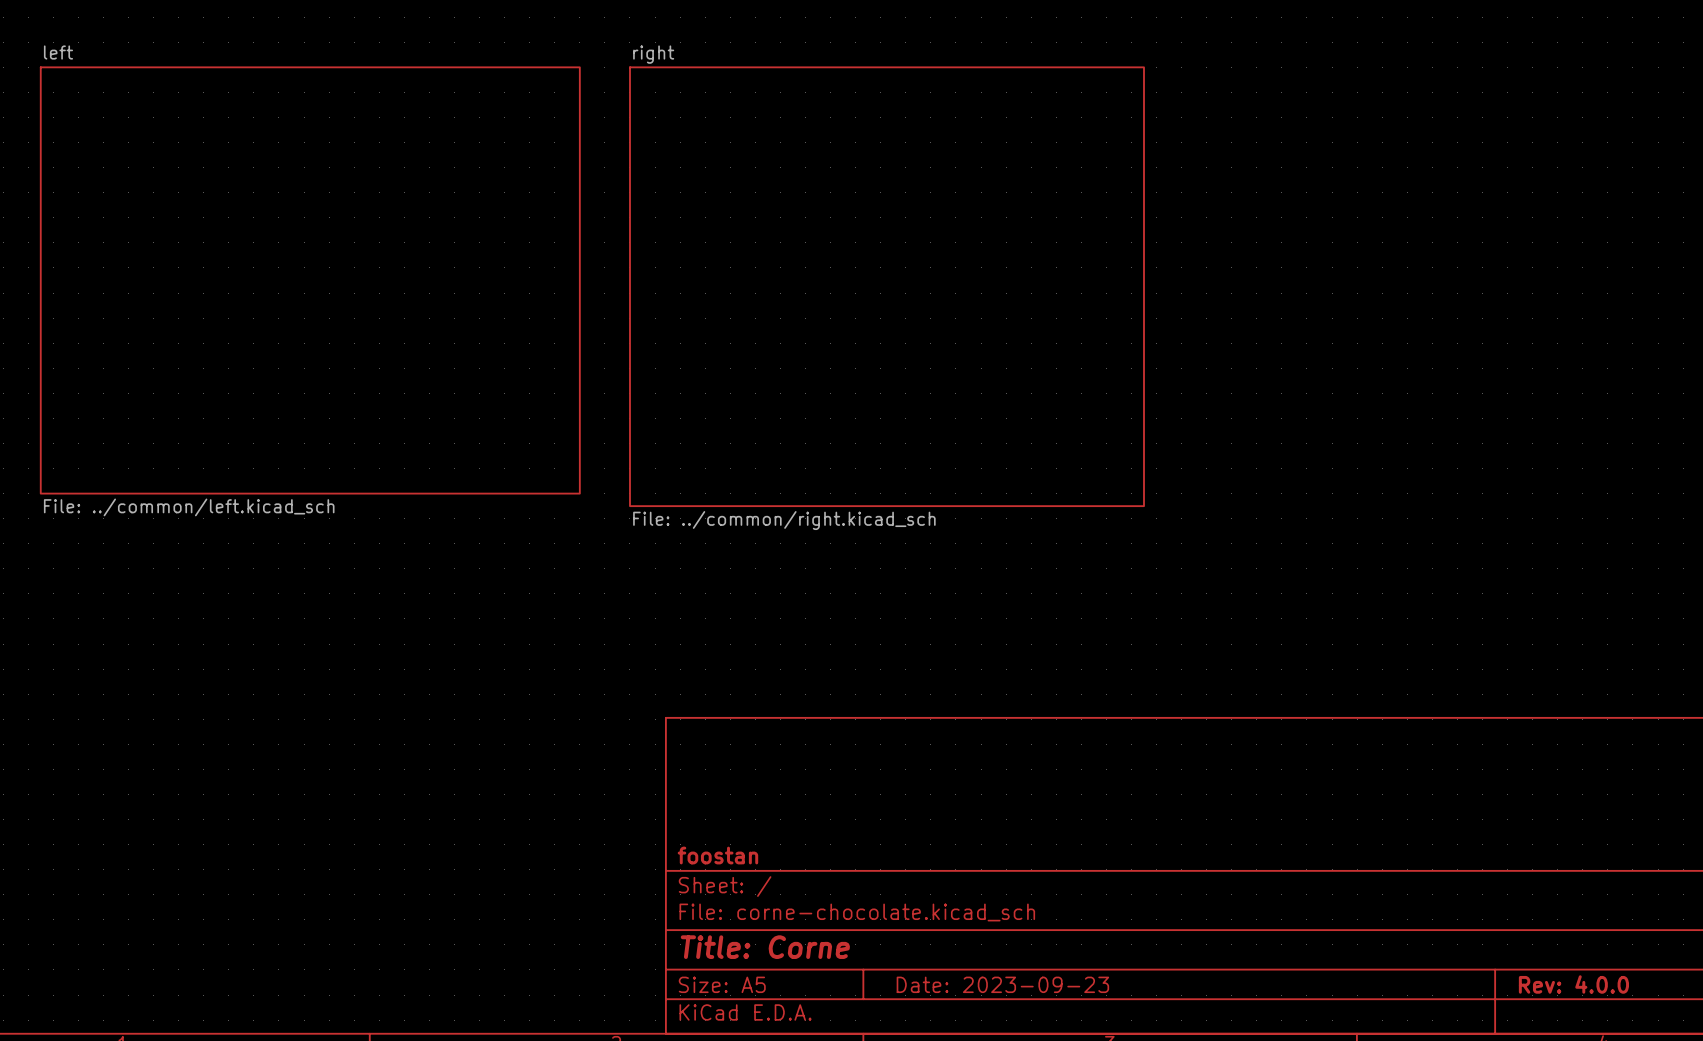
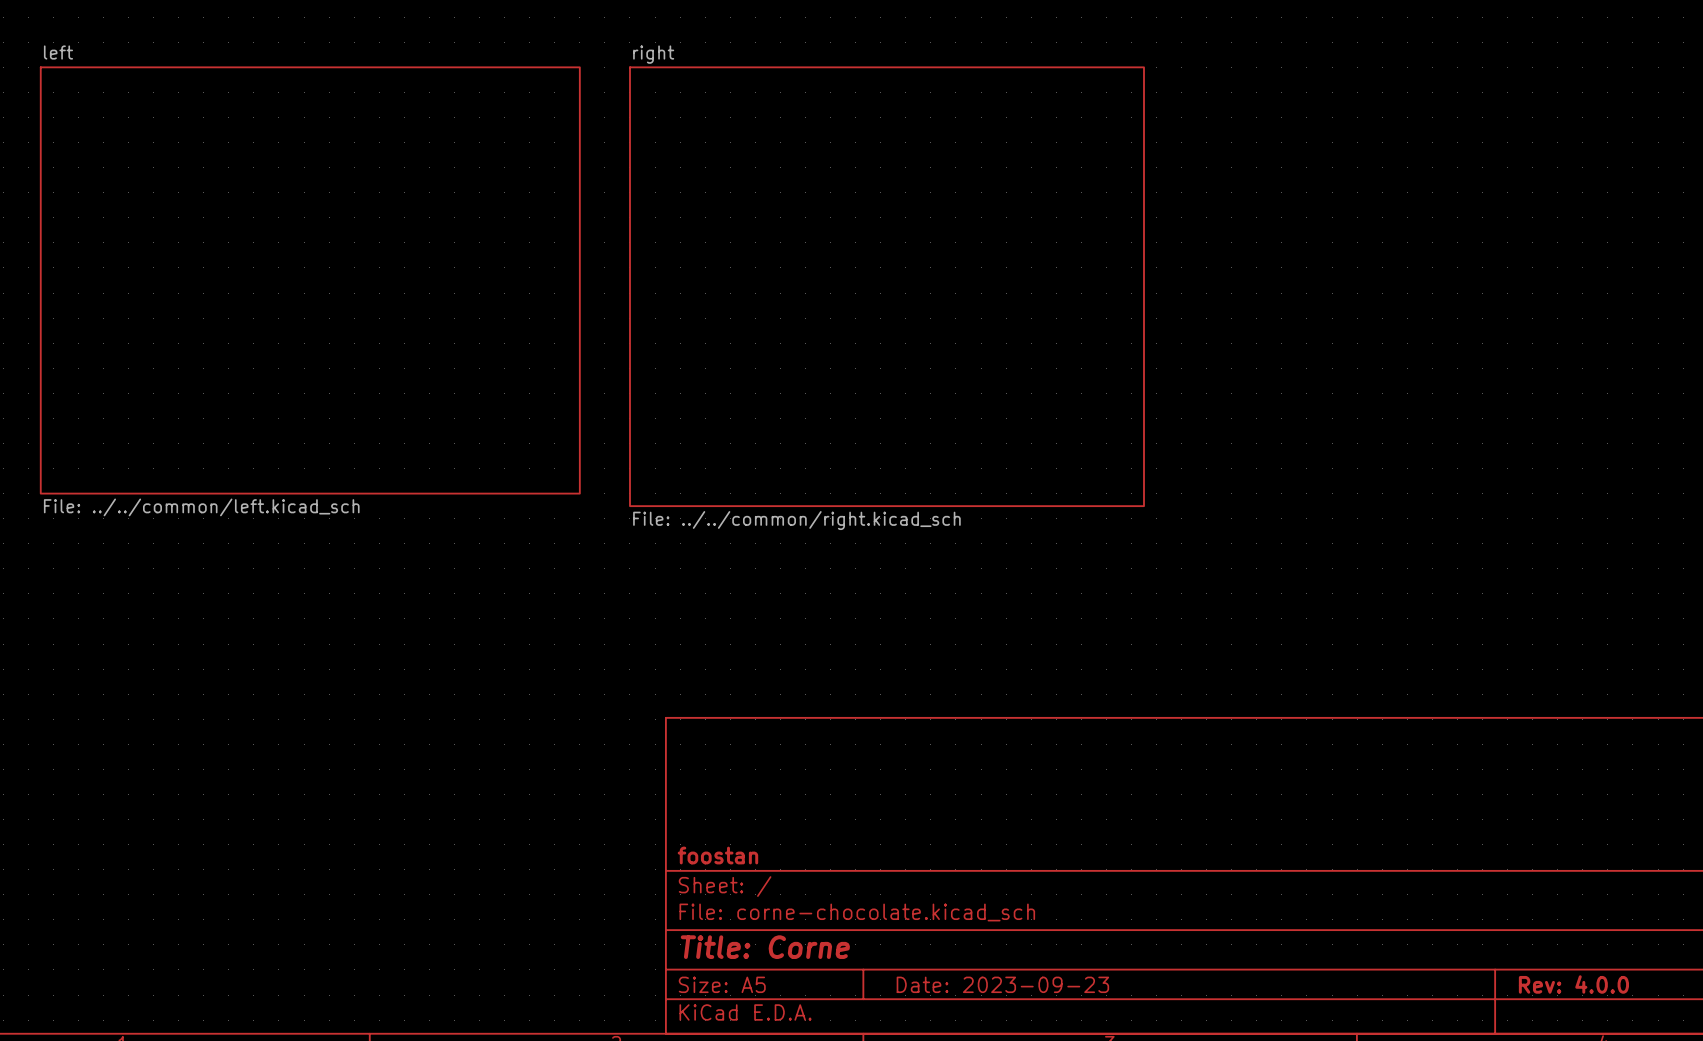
sheet left value: File: ../common/left.kicad_sch (189, 507) -> File: ../../common/left.kicad_sch (201, 507)
sheet right value: File: ../common/right.kicad_sch (784, 520) -> File: ../../common/right.kicad_sch (796, 520)

